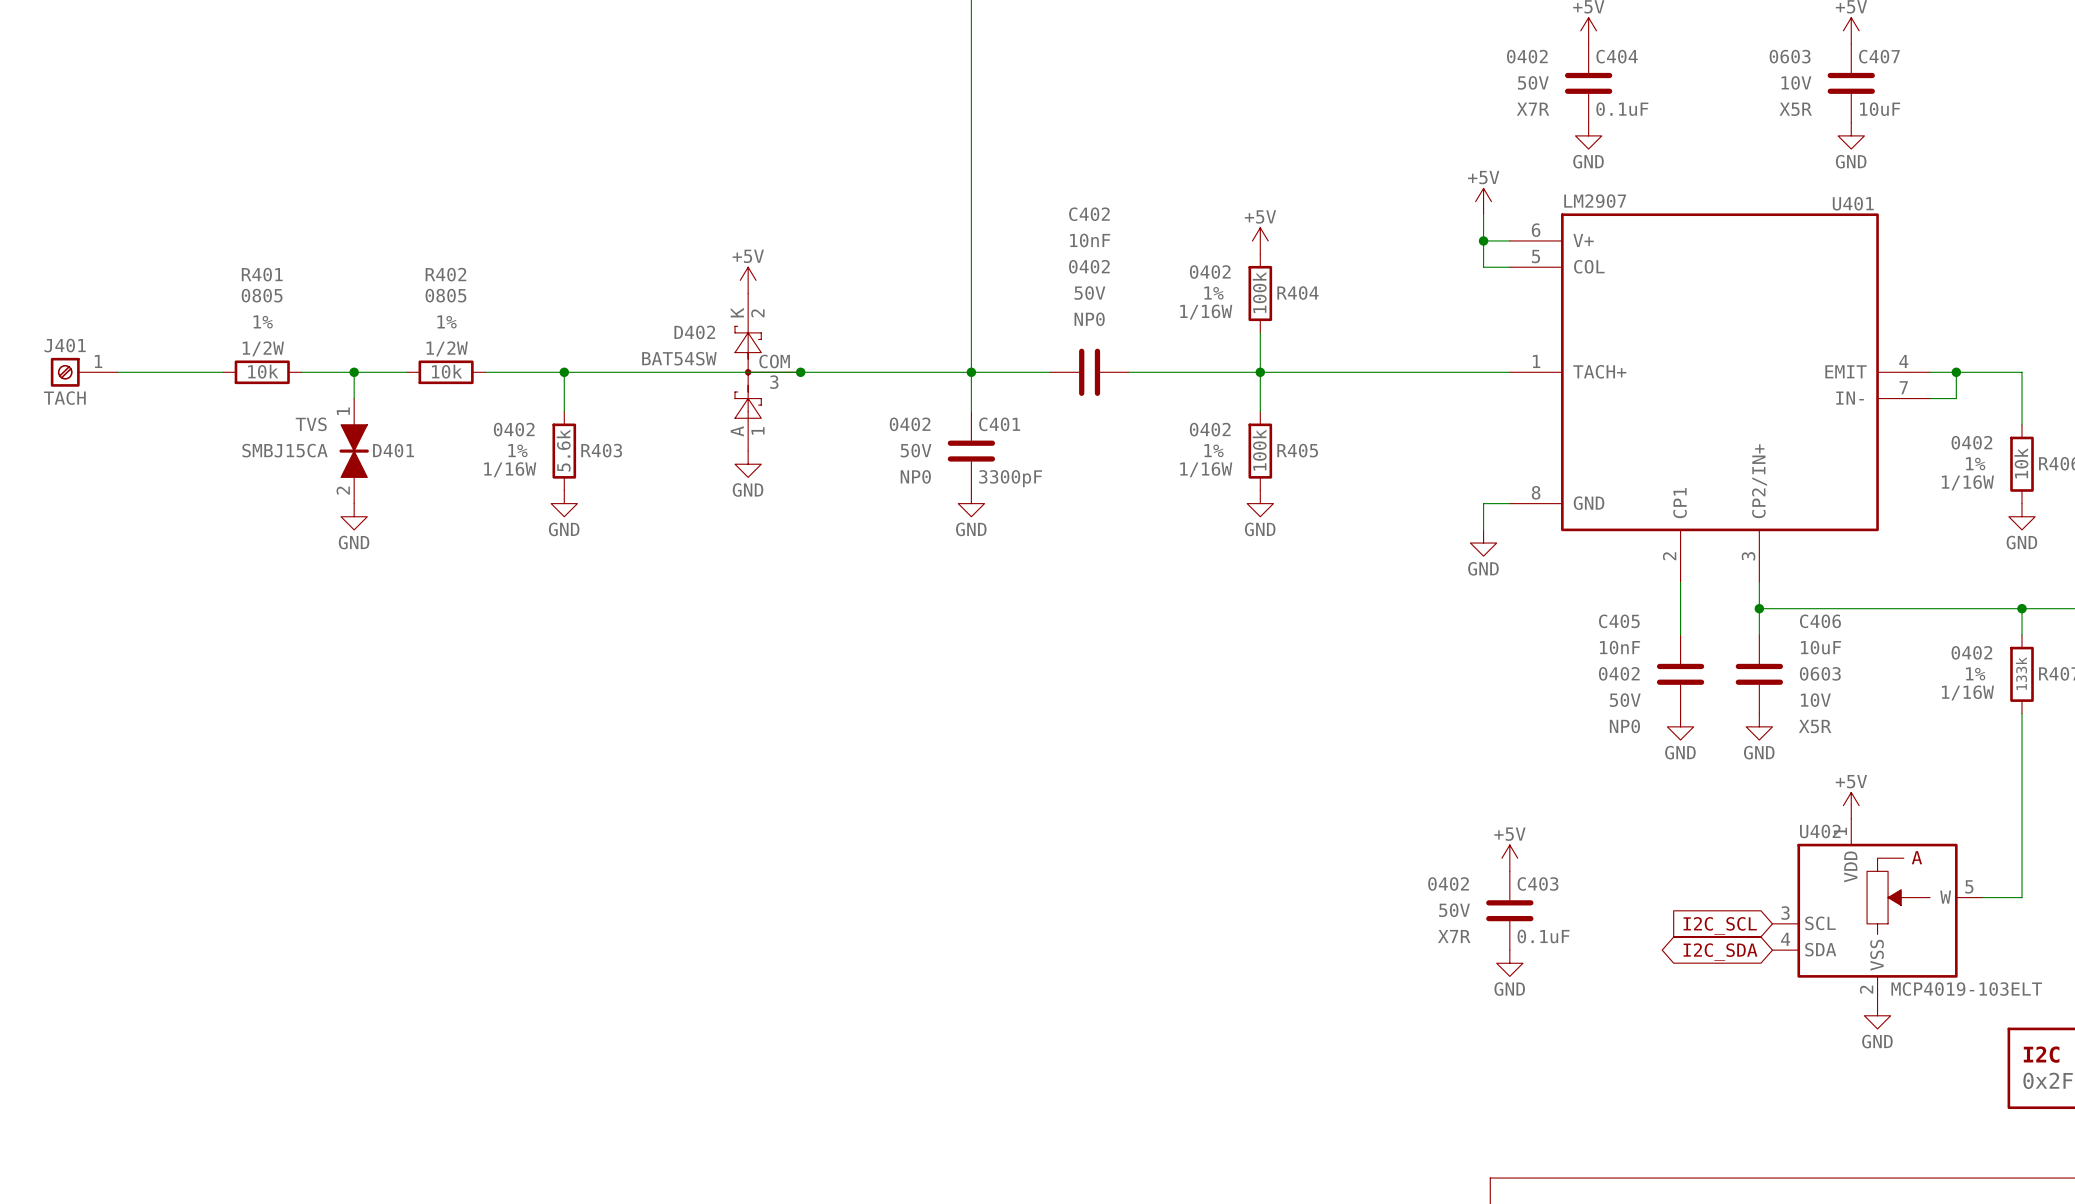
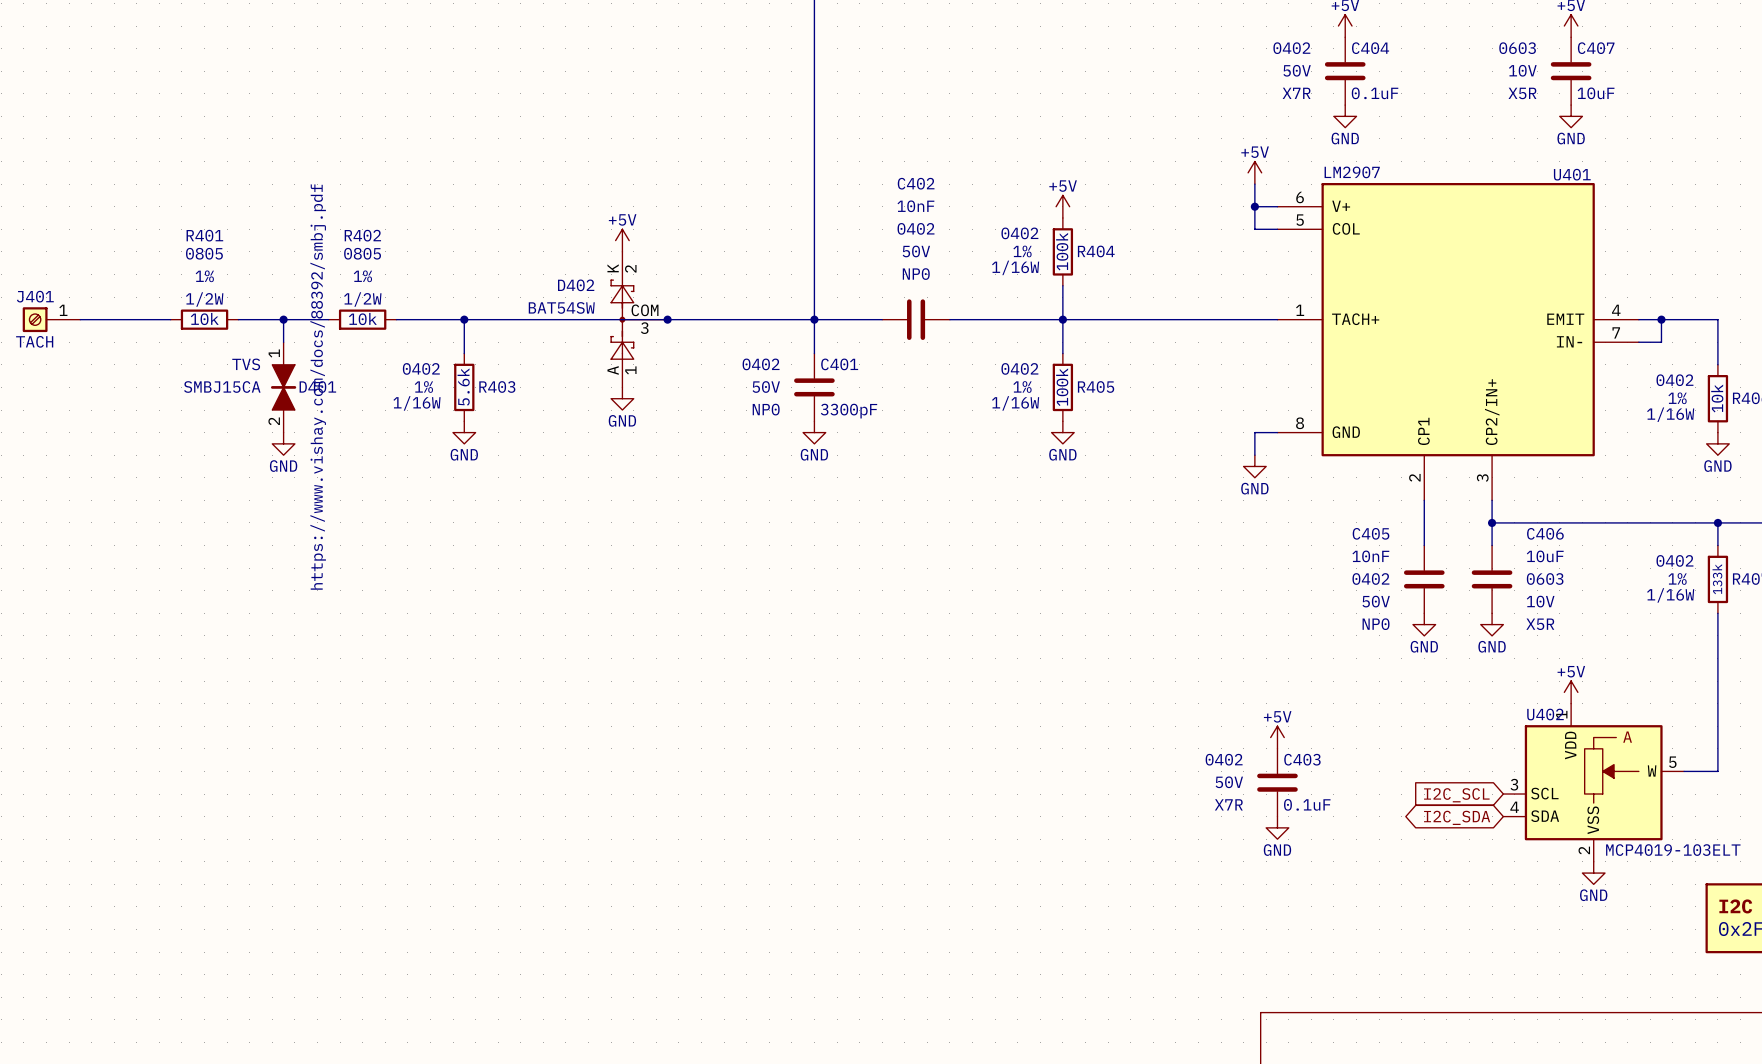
D401 text: none -> https://www.vishay.com/docs/88392/smbj.pdf (318, 387)

